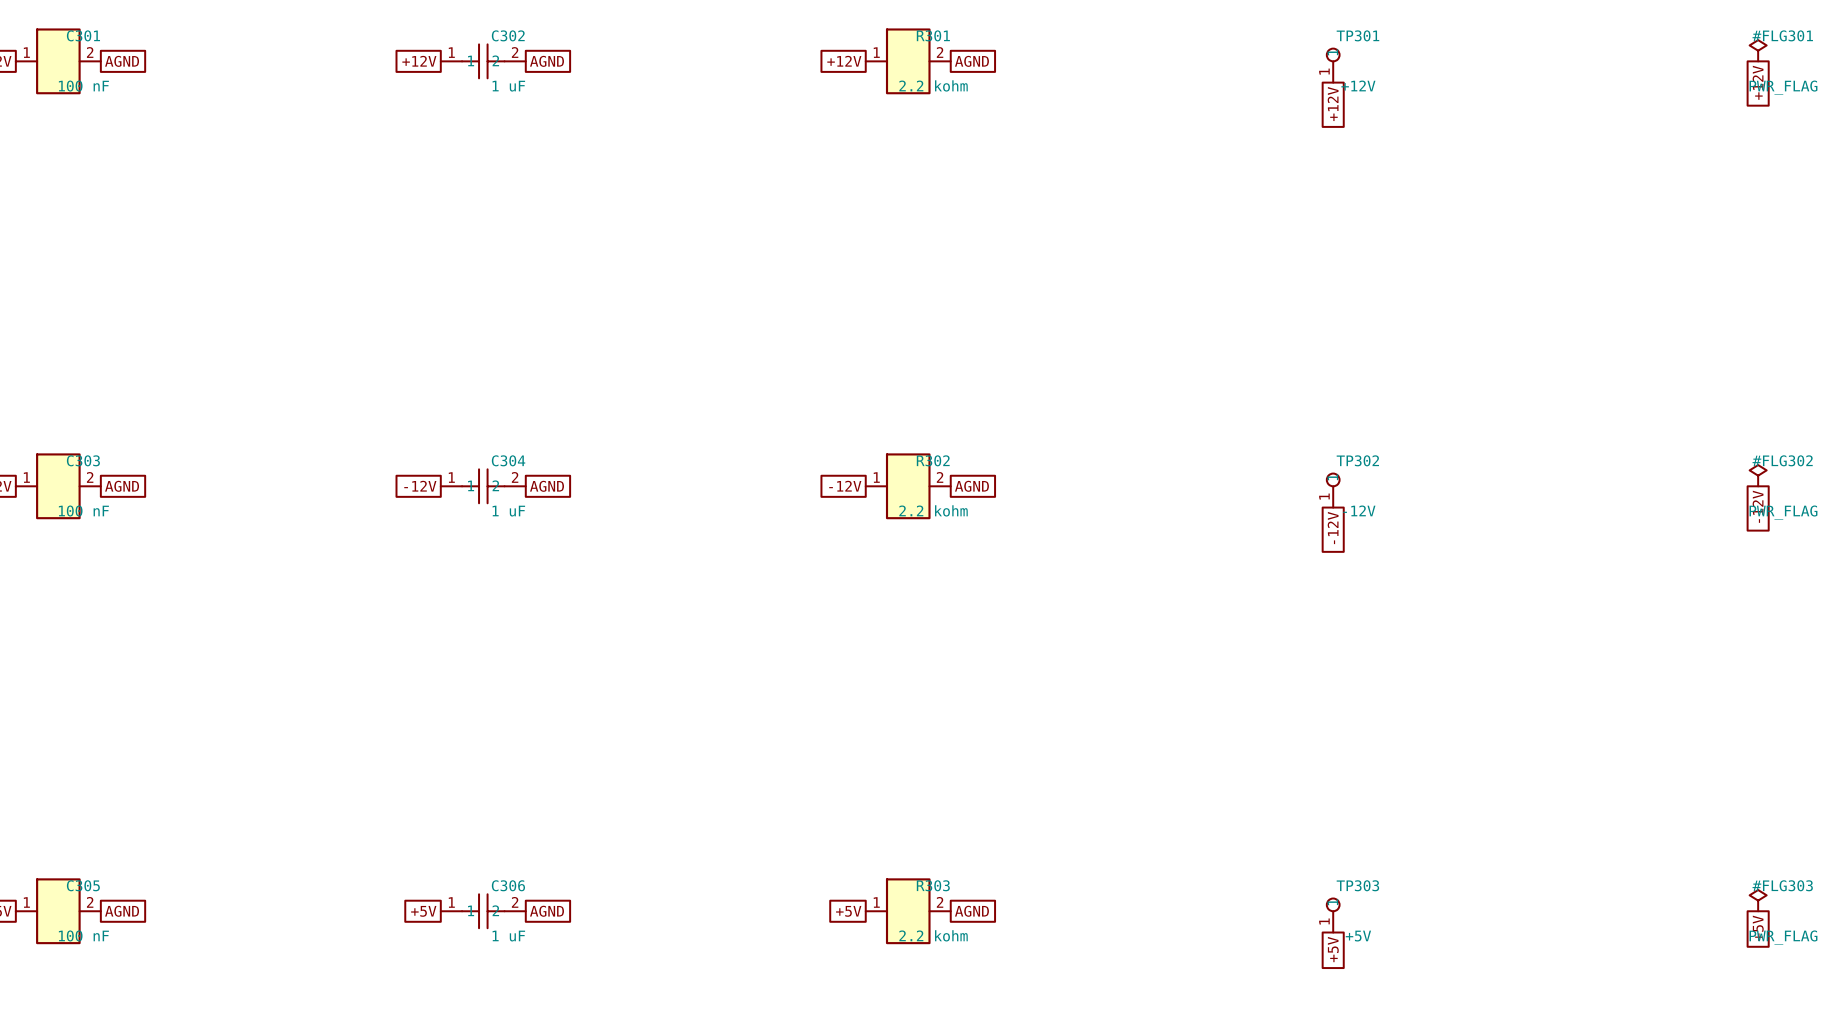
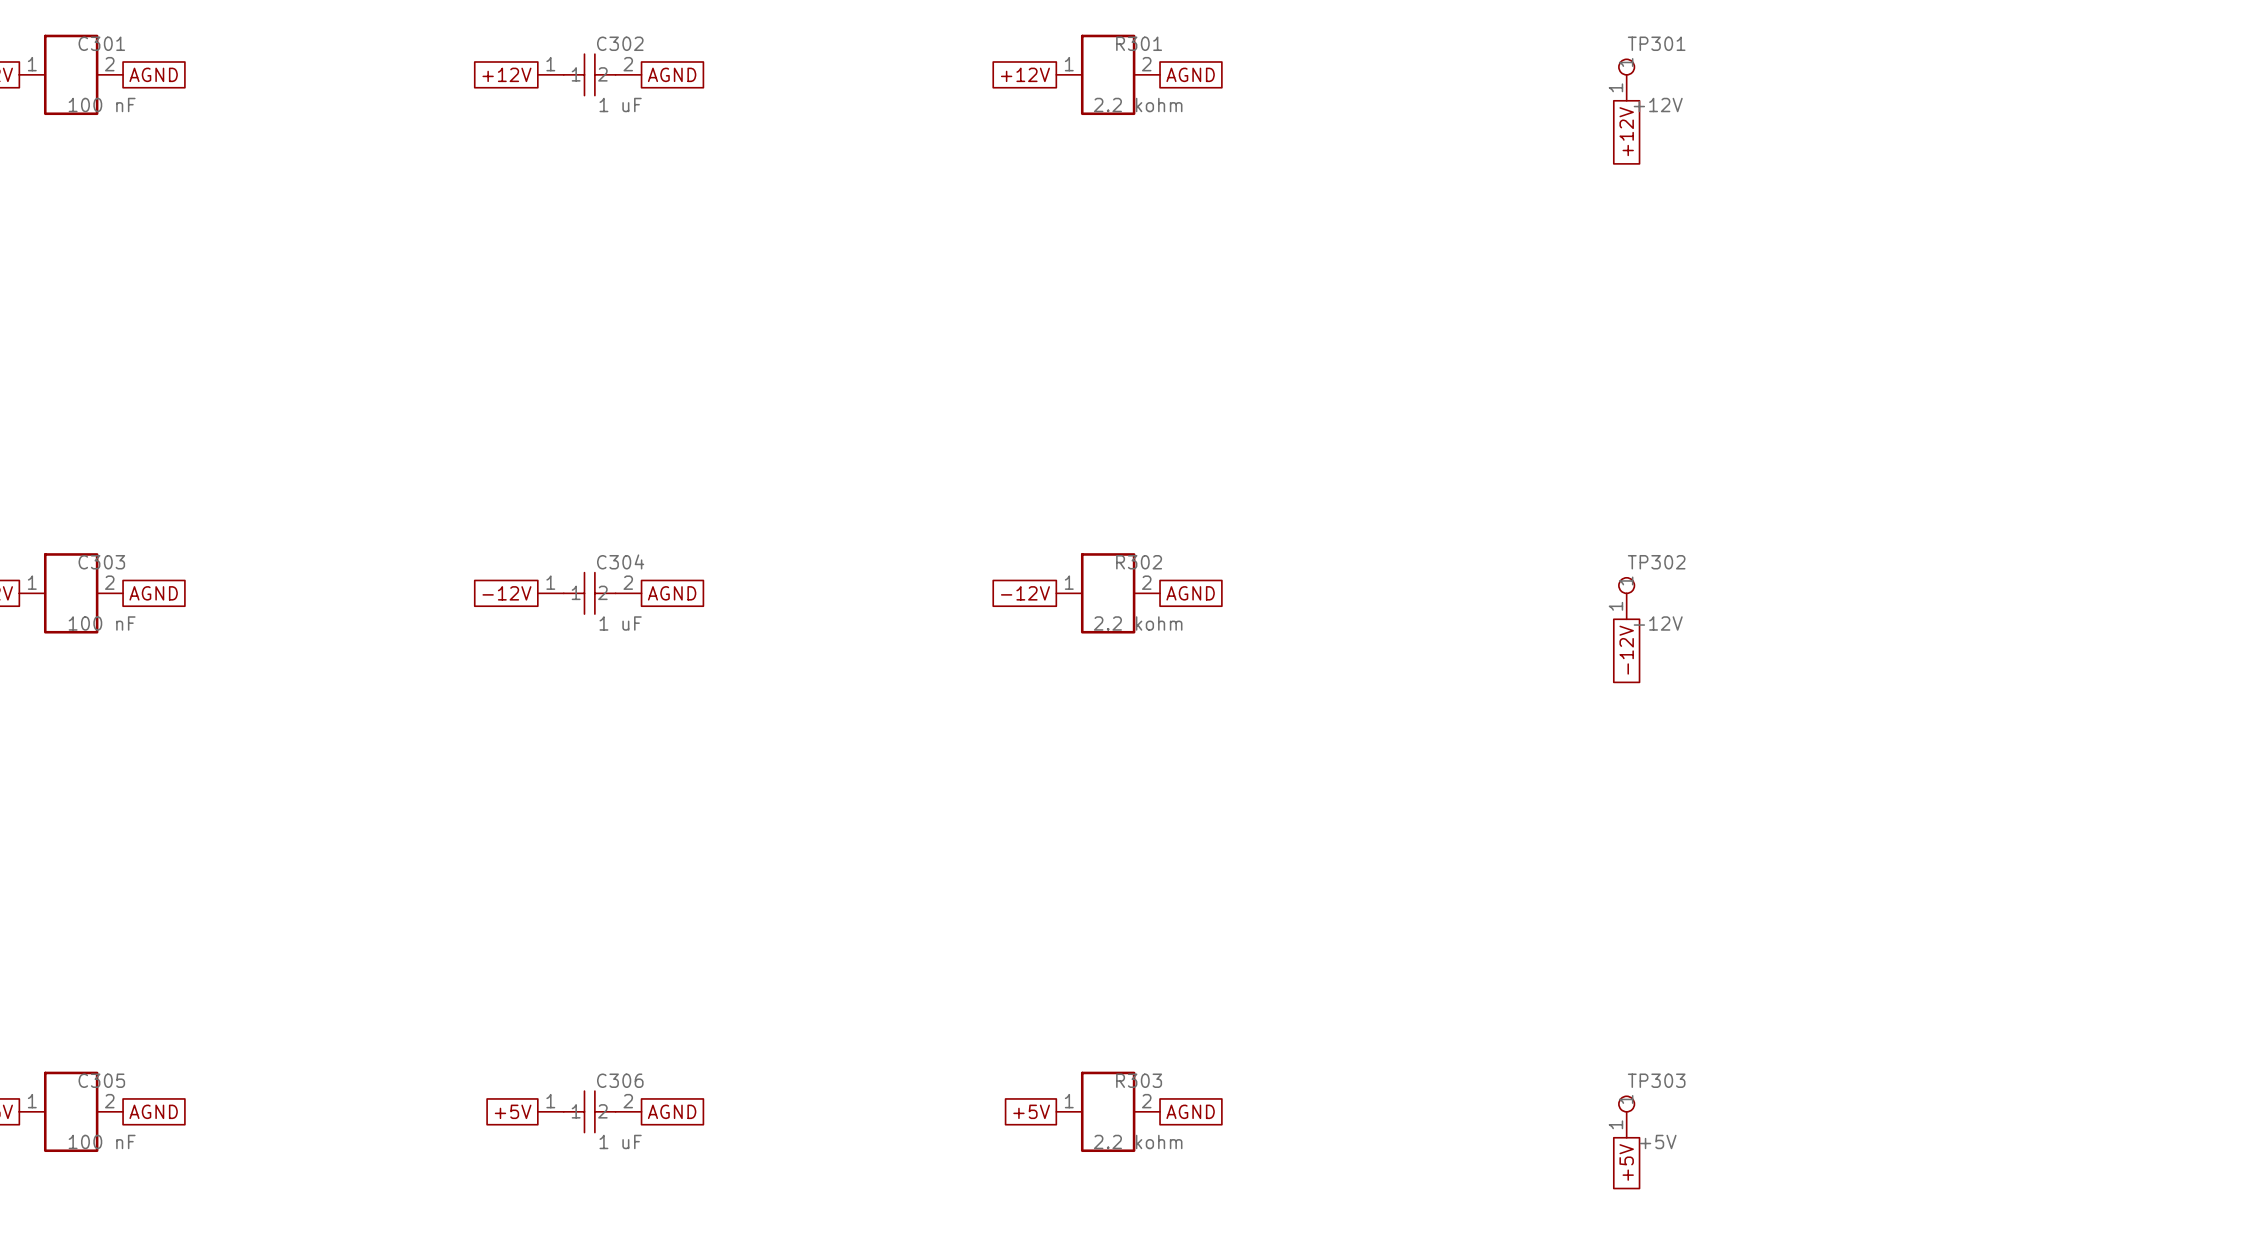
#FLG301: PWR_FLAG (1758, 50) -> none
global label: +12V (1758, 82) -> none
#FLG302: PWR_FLAG (1758, 475) -> none
global label: -12V (1758, 506) -> none
#FLG303: PWR_FLAG (1758, 900) -> none
global label: +5V (1758, 928) -> none

